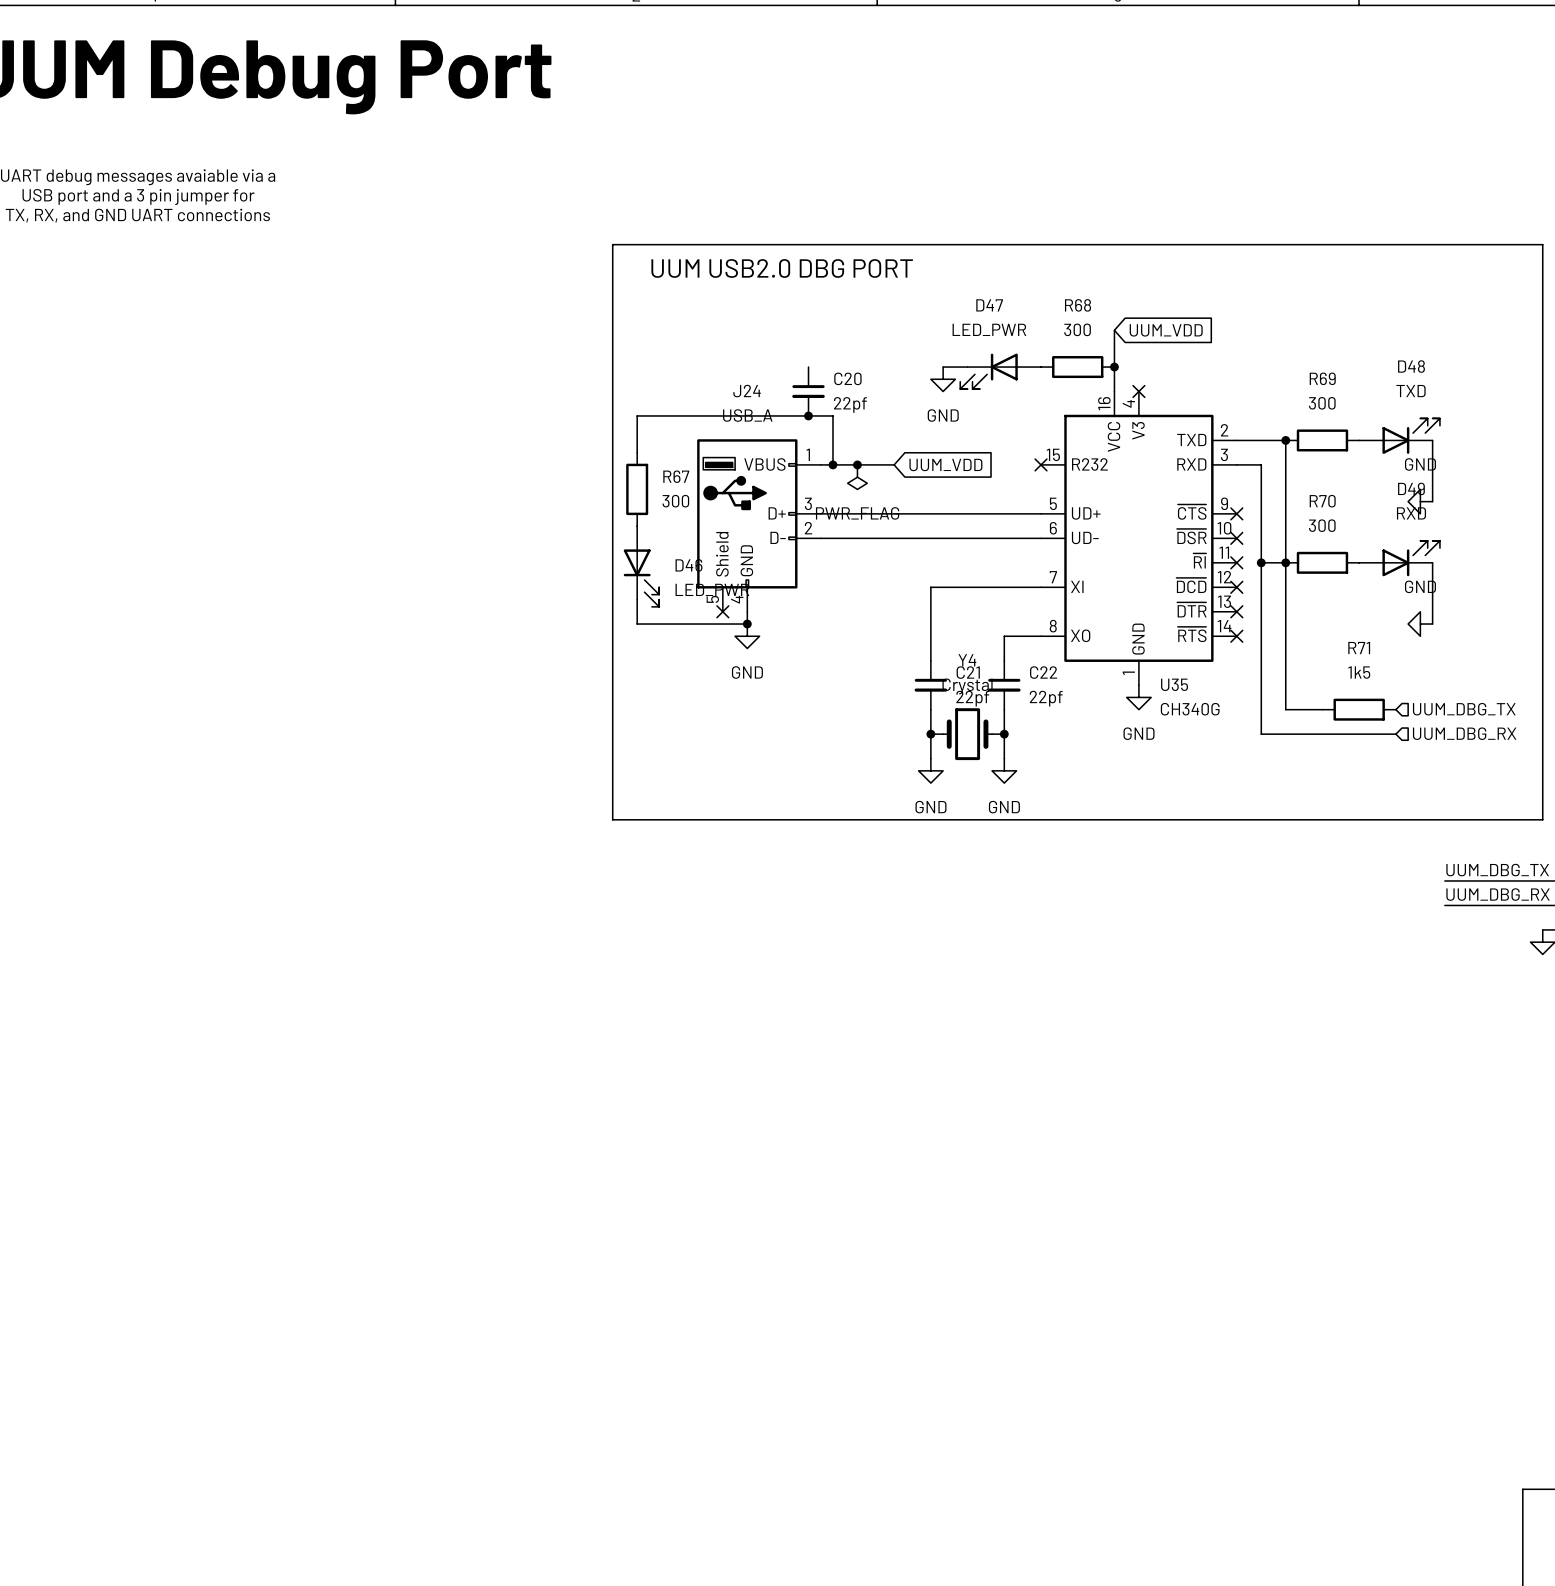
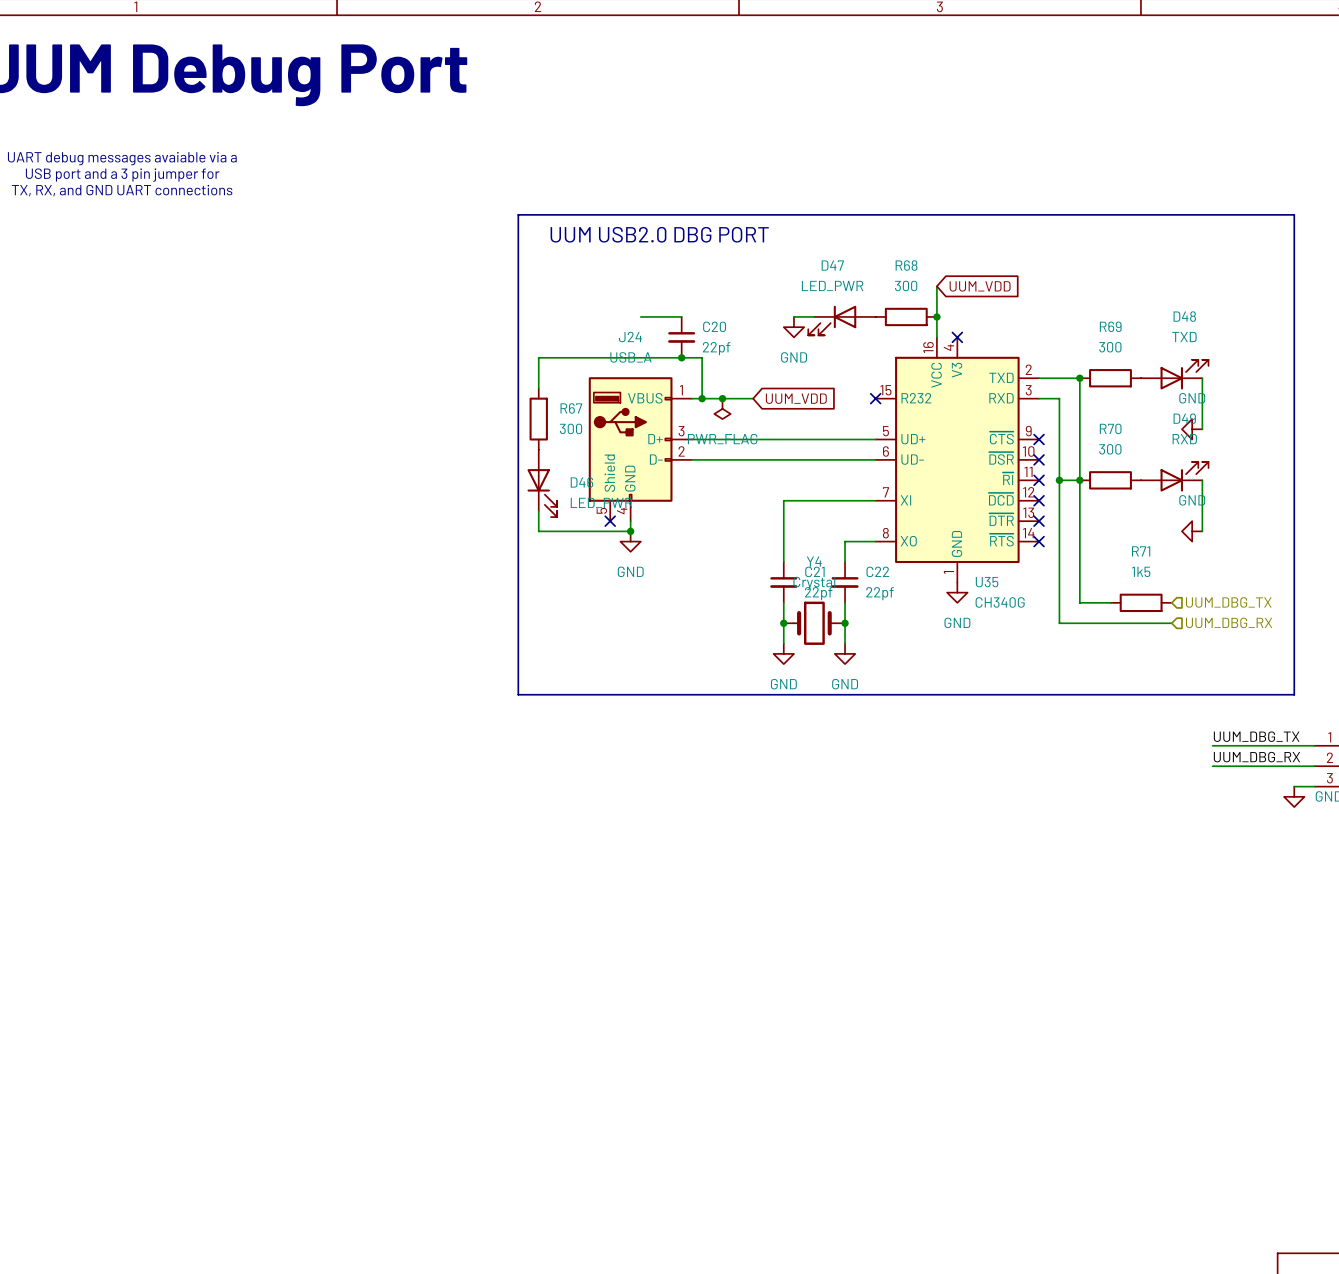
wire: none -> (640, 316) (681, 316)

